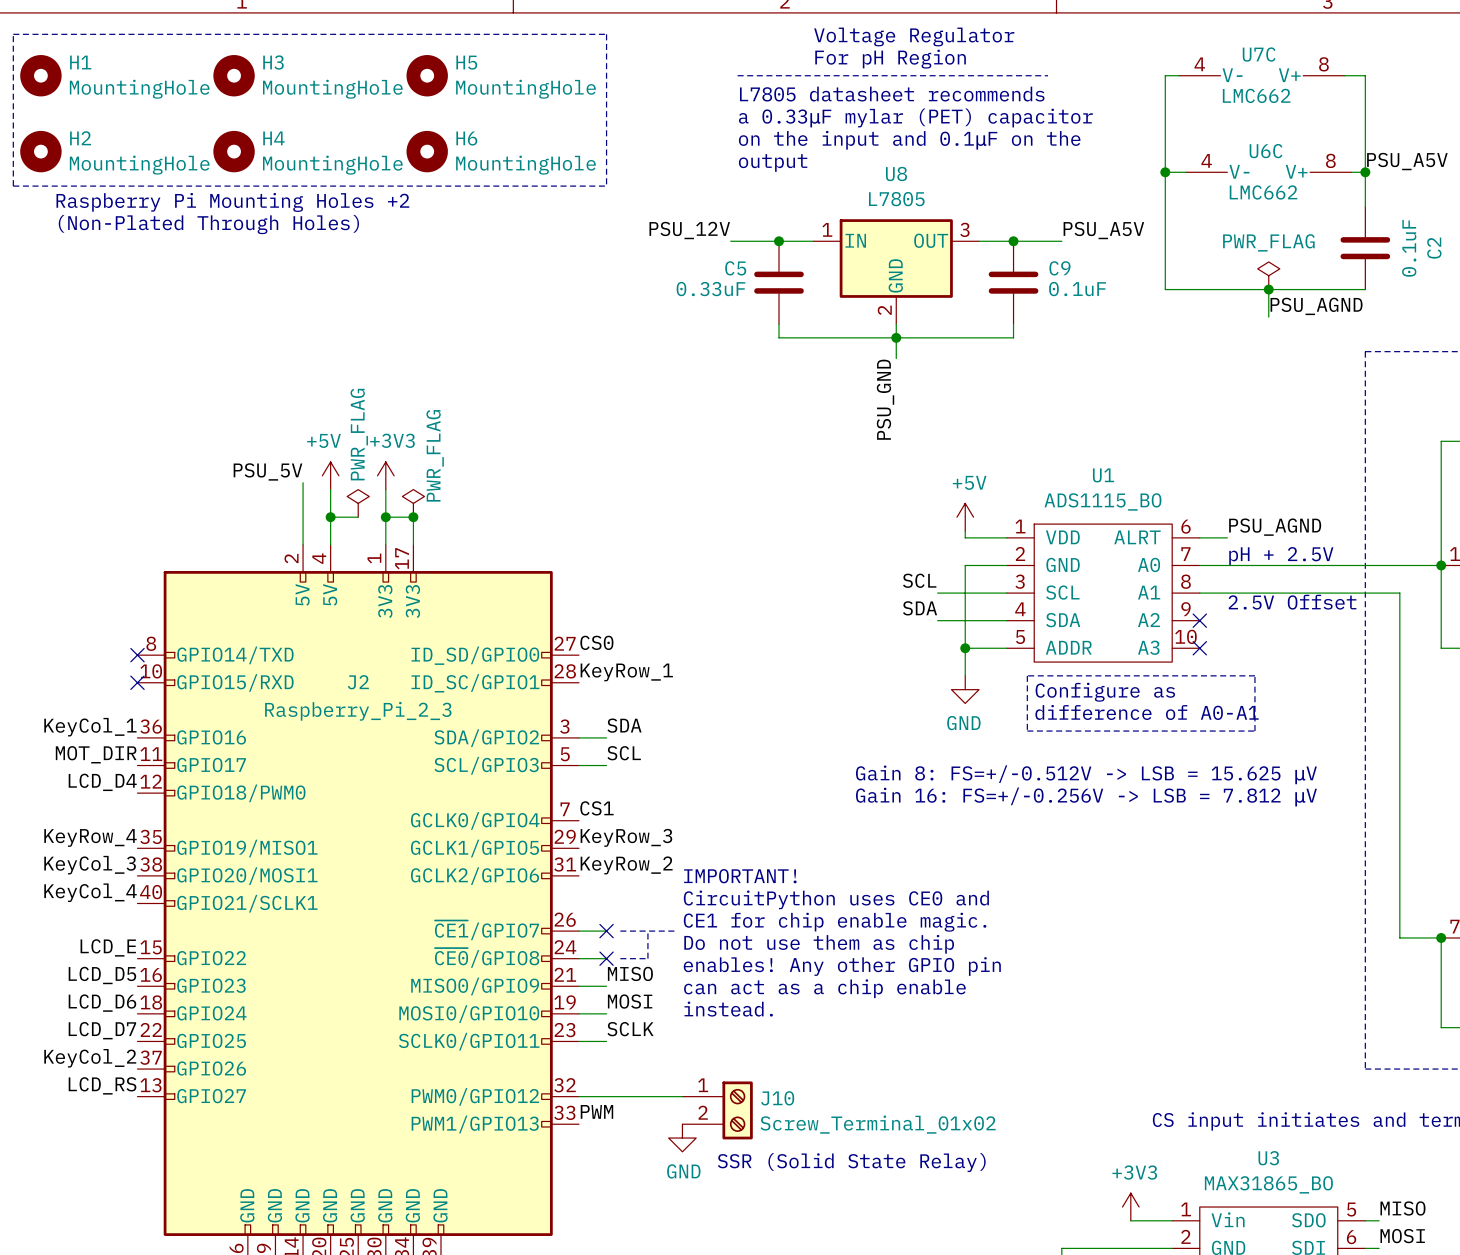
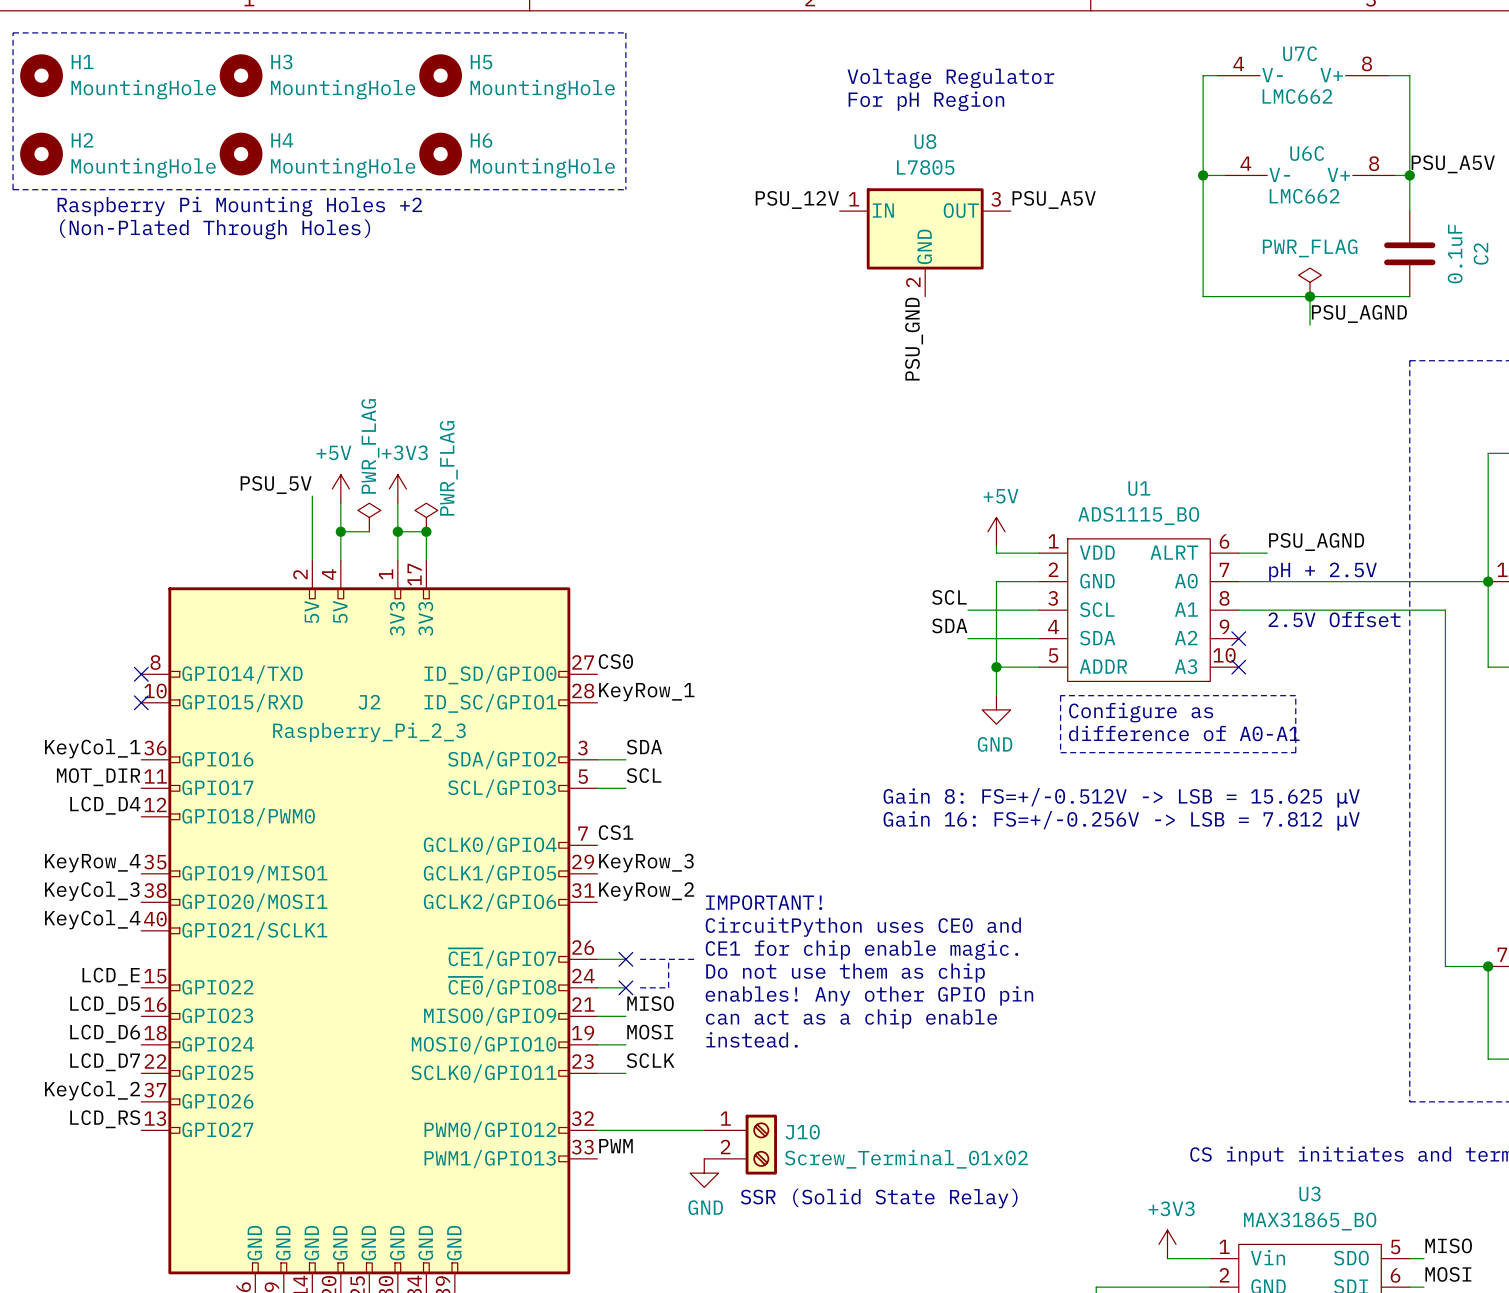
text position: Voltage Regulator (914, 36) -> Voltage Regulator (950, 78)
text position: For pH Region (890, 59) -> For pH Region (926, 101)
line: (737, 75) (1048, 75) -> none
text: L7805 datasheet recommends (892, 94) -> none
text: a 0.33μF mylar (PET) capacitor (915, 117) -> none
text: on the input and 0.1μF on the (909, 140) -> none
text: output (773, 162) -> none
label position: PSU_12V (689, 230) -> PSU_12V (797, 199)
label position: PSU_A5V (1103, 230) -> PSU_A5V (1054, 199)
wire: (730, 241) (813, 241) -> none
junction: (779, 241) -> none
wire: (979, 241) (1061, 241) -> none
junction: (1013, 241) -> none
U8 position: (896, 271) -> (925, 242)
C5: 0.33uF (779, 282) -> none
C9: 0.1uF (1013, 282) -> none
wire: (779, 324) (779, 337) (1013, 337) (1013, 324) -> none
wire: (896, 324) (896, 358) -> none
junction: (896, 337) -> none
label position: PSU_GND (885, 399) -> PSU_GND (914, 339)

